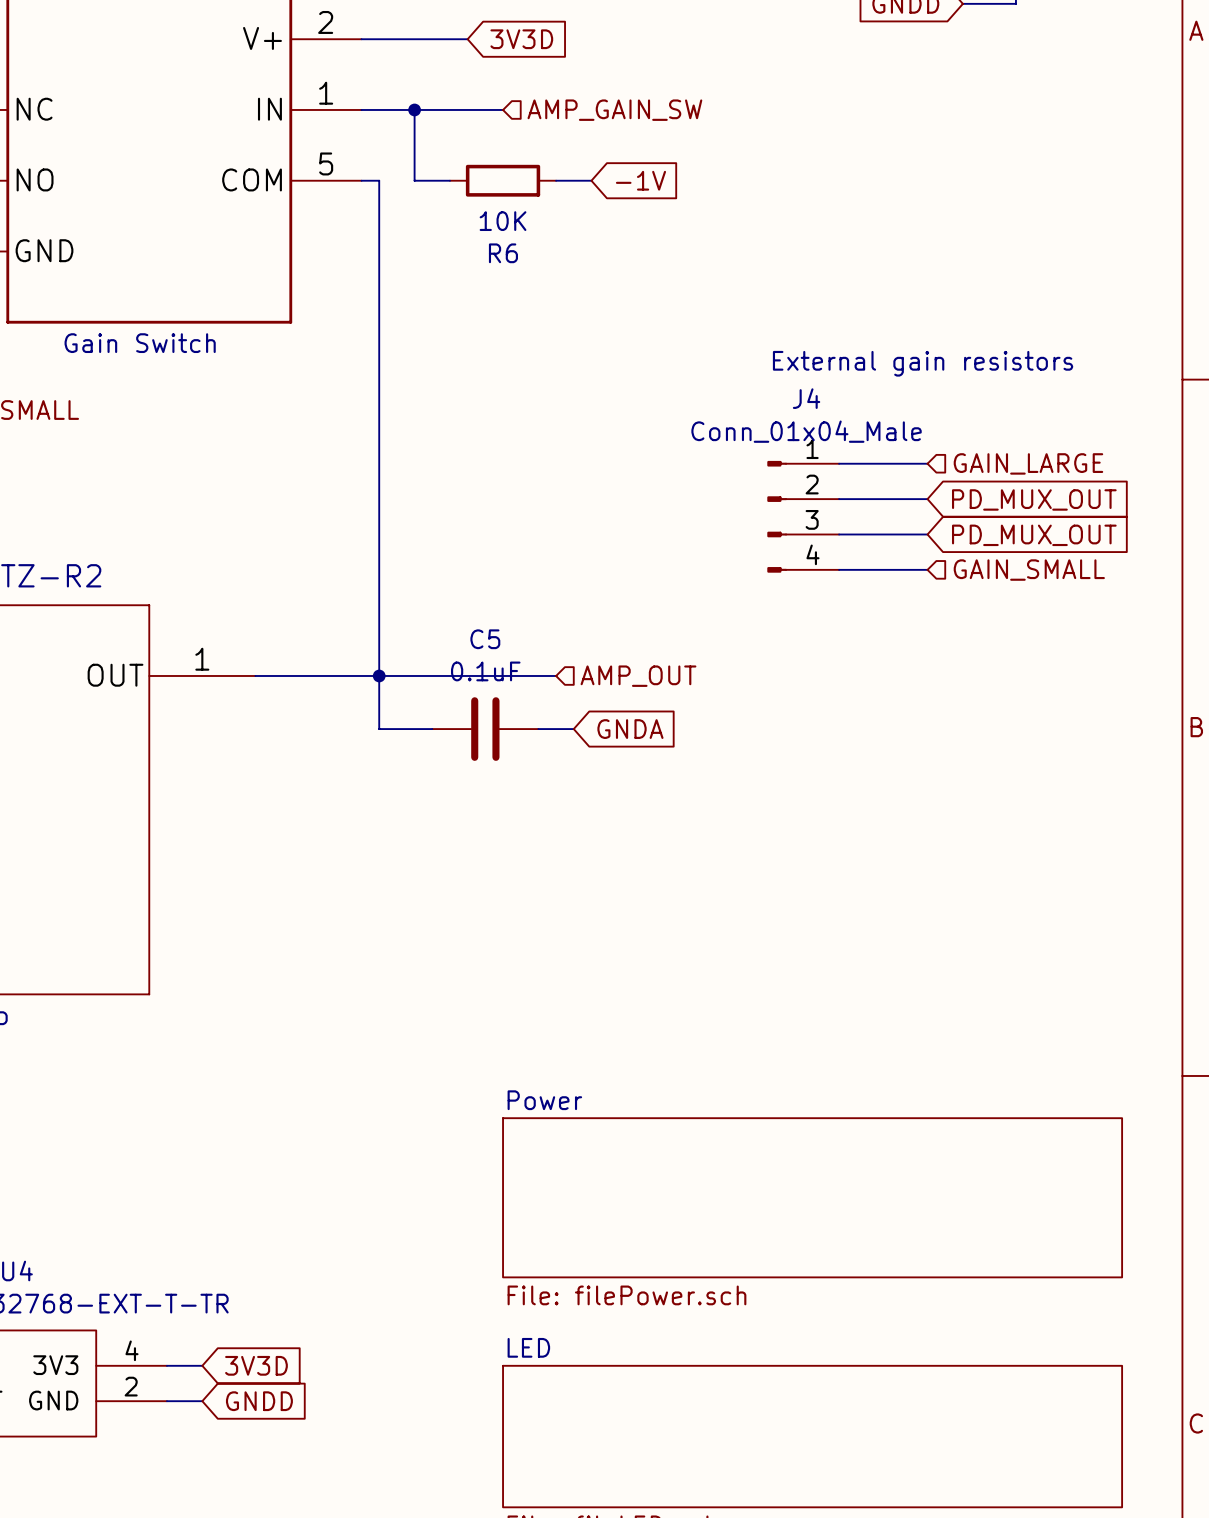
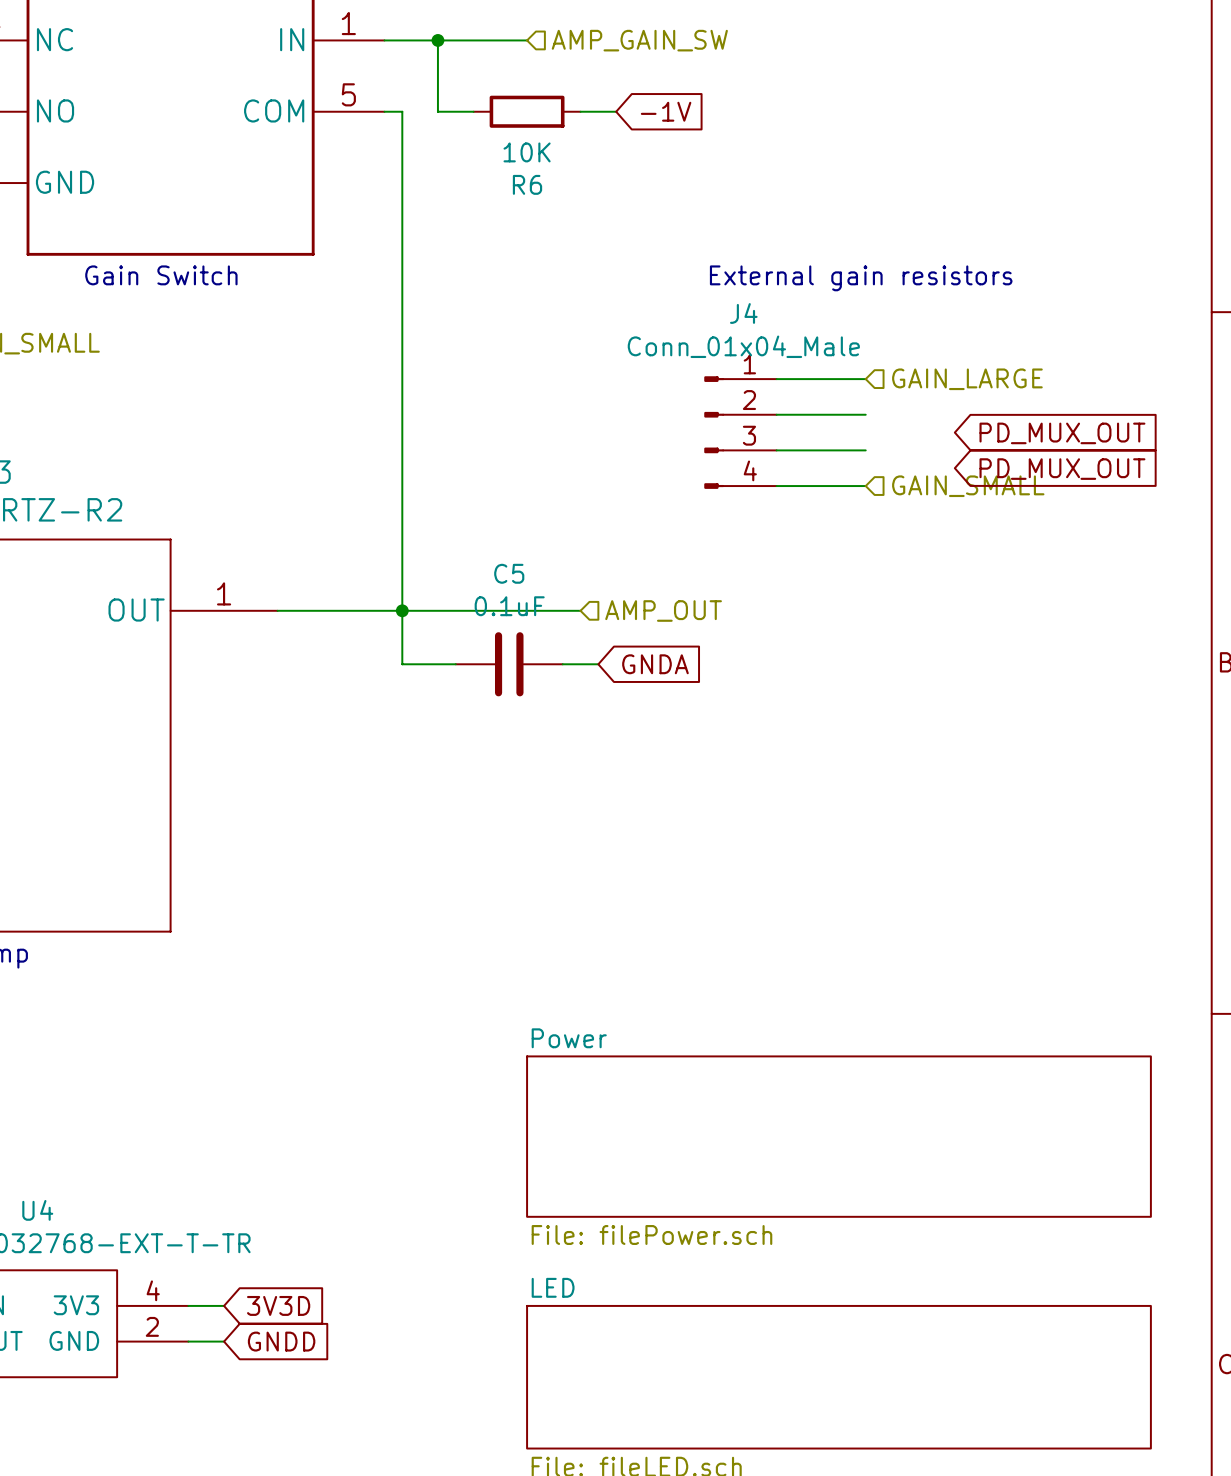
text position: External gain resistors (923, 363) -> External gain resistors (861, 278)
wire: (839, 463) (927, 463) -> (776, 379) (865, 379)
hierarchical label position: GAIN_LARGE (1028, 463) -> GAIN_LARGE (967, 379)
wire: (839, 499) (927, 499) -> (776, 414) (865, 414)
J4 position: (803, 516) -> (740, 432)
wire: (839, 534) (927, 534) -> (776, 450) (865, 450)
wire: (839, 569) (927, 569) -> (776, 486) (865, 486)
hierarchical label position: GAIN_SMALL (1029, 570) -> GAIN_SMALL (968, 486)

